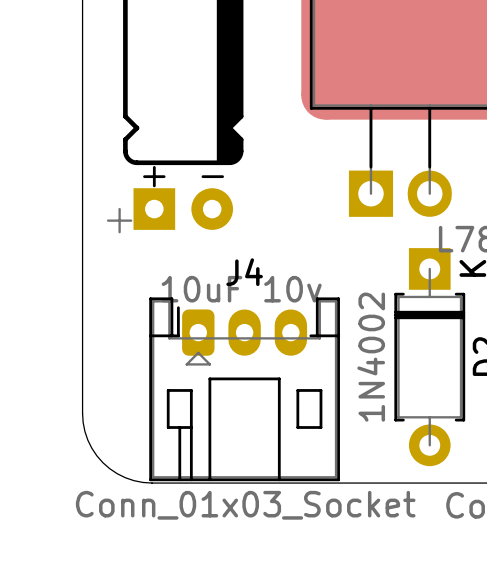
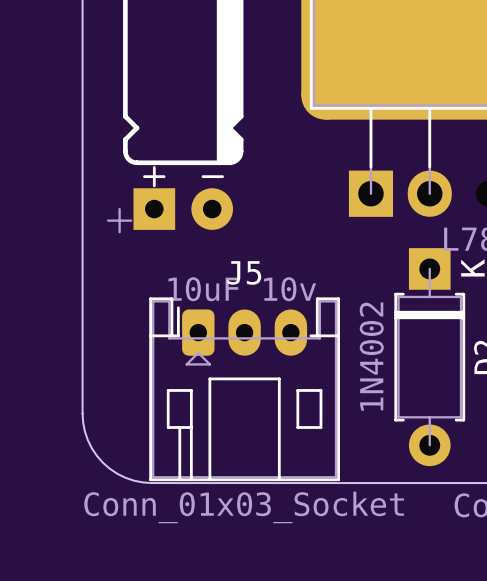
J4 name: J4 (244, 272) -> J5 (244, 272)

